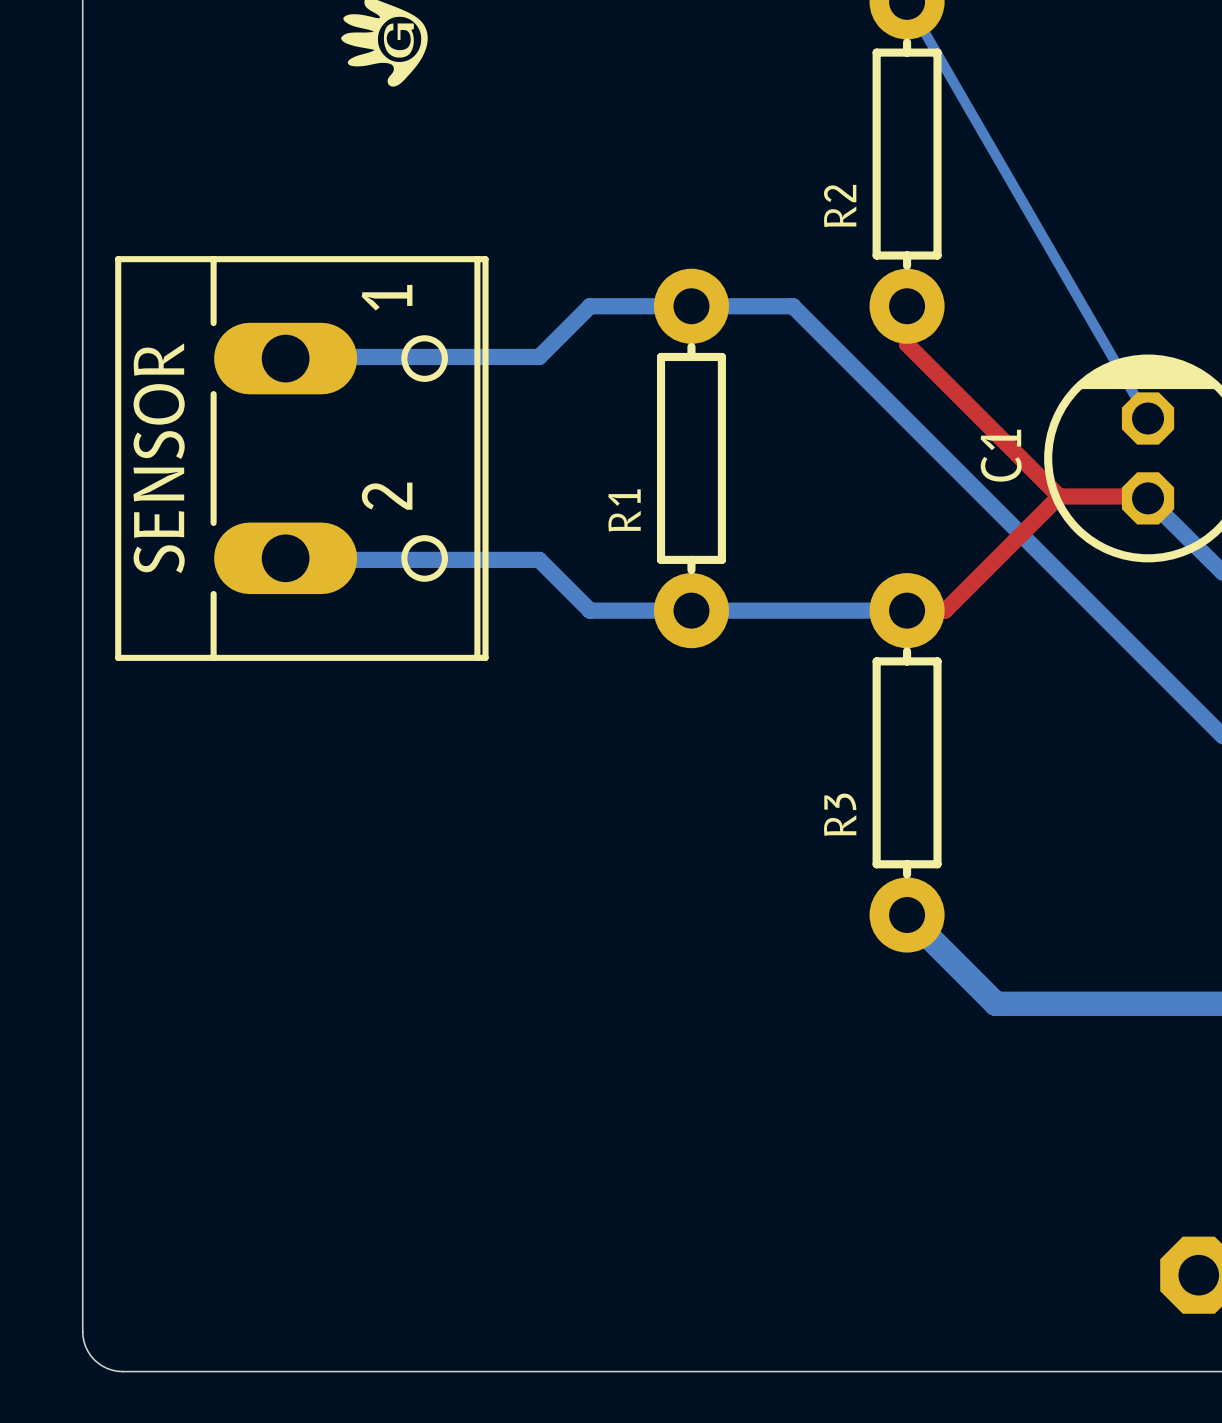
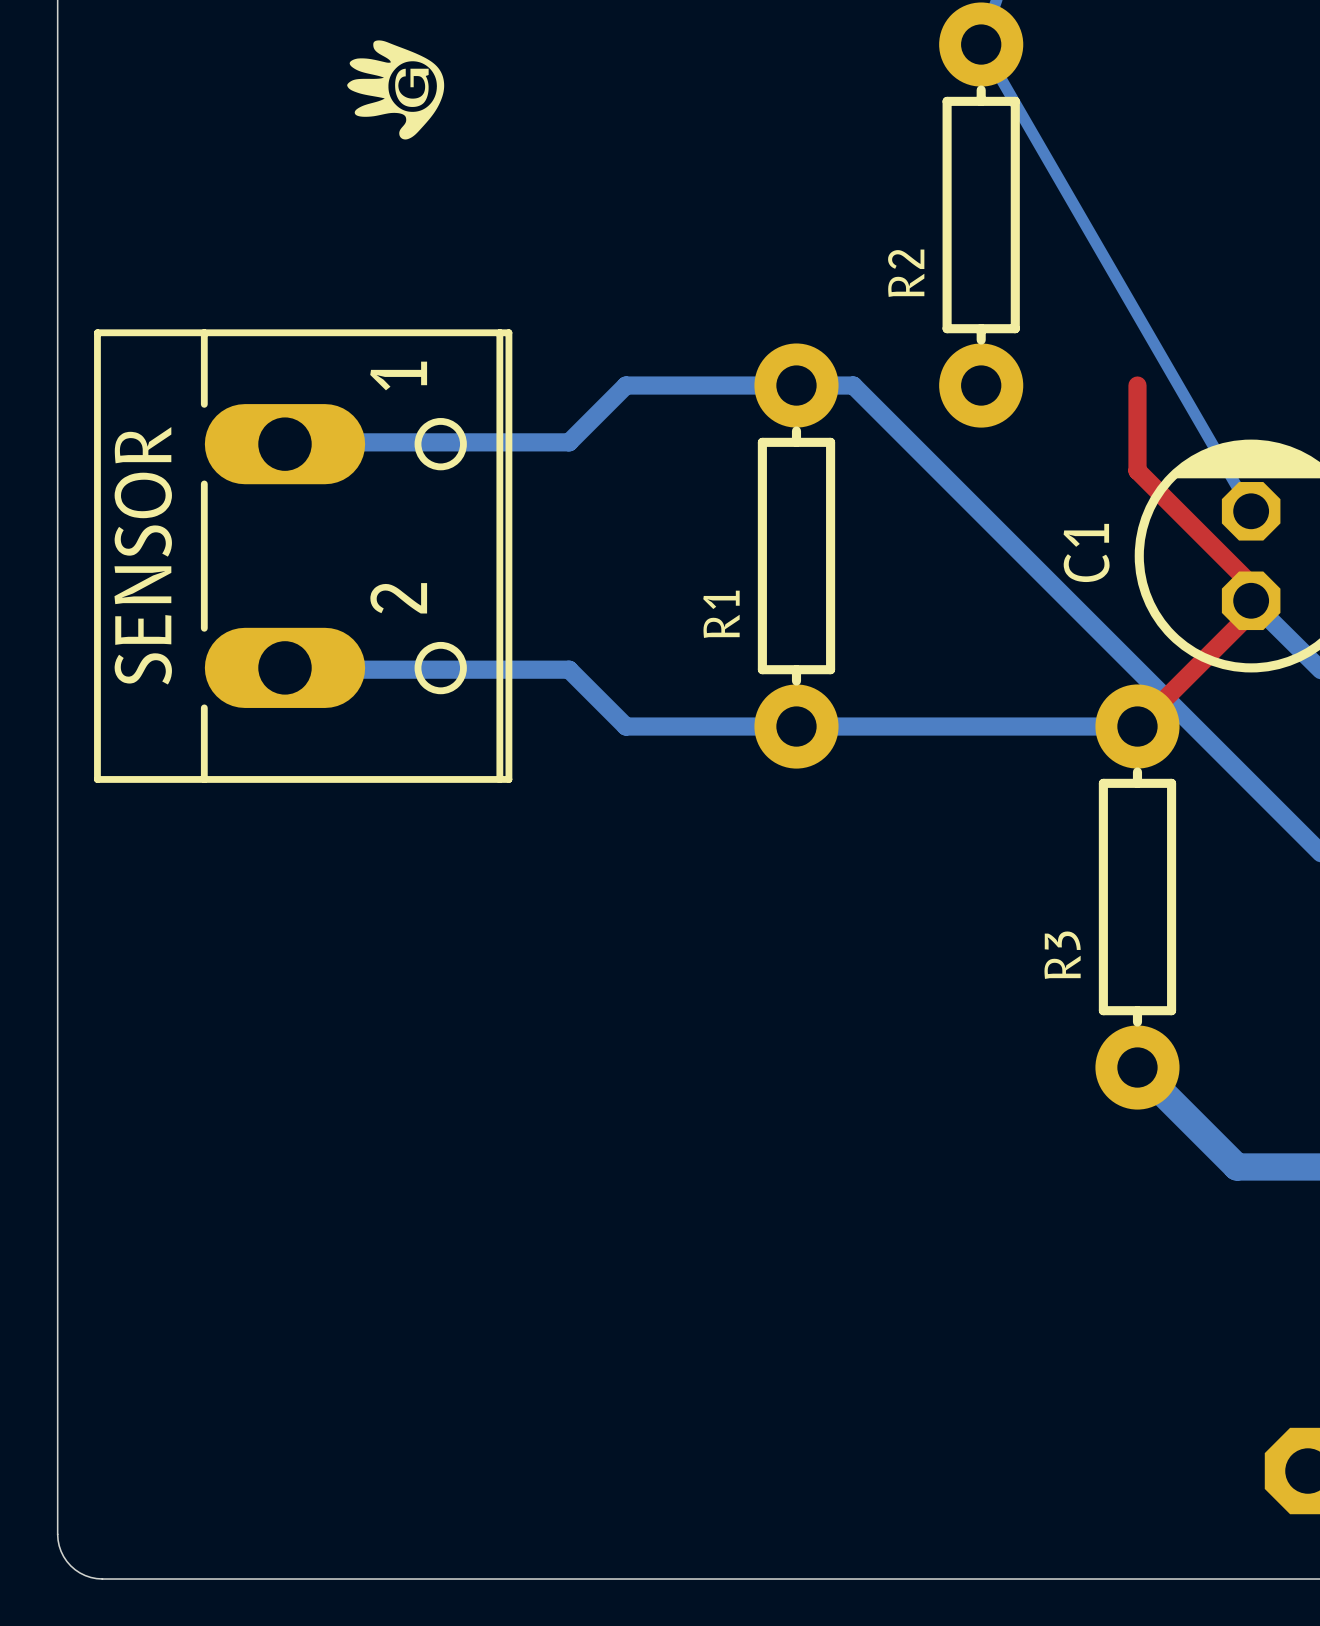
top track: (907, 306) (907, 344) (1059, 496) -> none
top track: none -> (1137, 385) (1137, 470) (1265, 598) (1137, 726)
R1 position: (691, 458) -> (796, 556)
top track: (1059, 496) (1148, 496) (1148, 498) -> none
top track: (1059, 496) (945, 610) (907, 610) -> none
bottom track: none -> (981, 726) (1137, 726)
R3 position: (907, 762) -> (1137, 897)
bottom track: (907, 915) (995, 1003) (1135, 1003) -> (1137, 1067) (1236, 1166)

